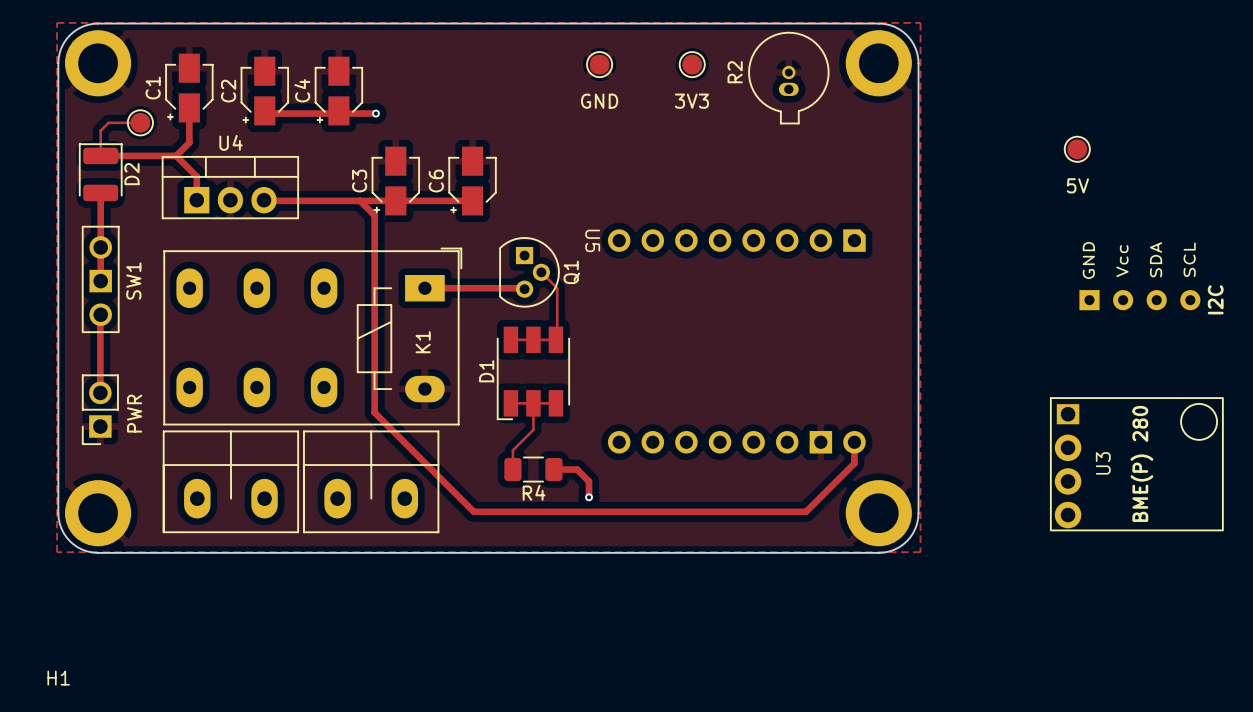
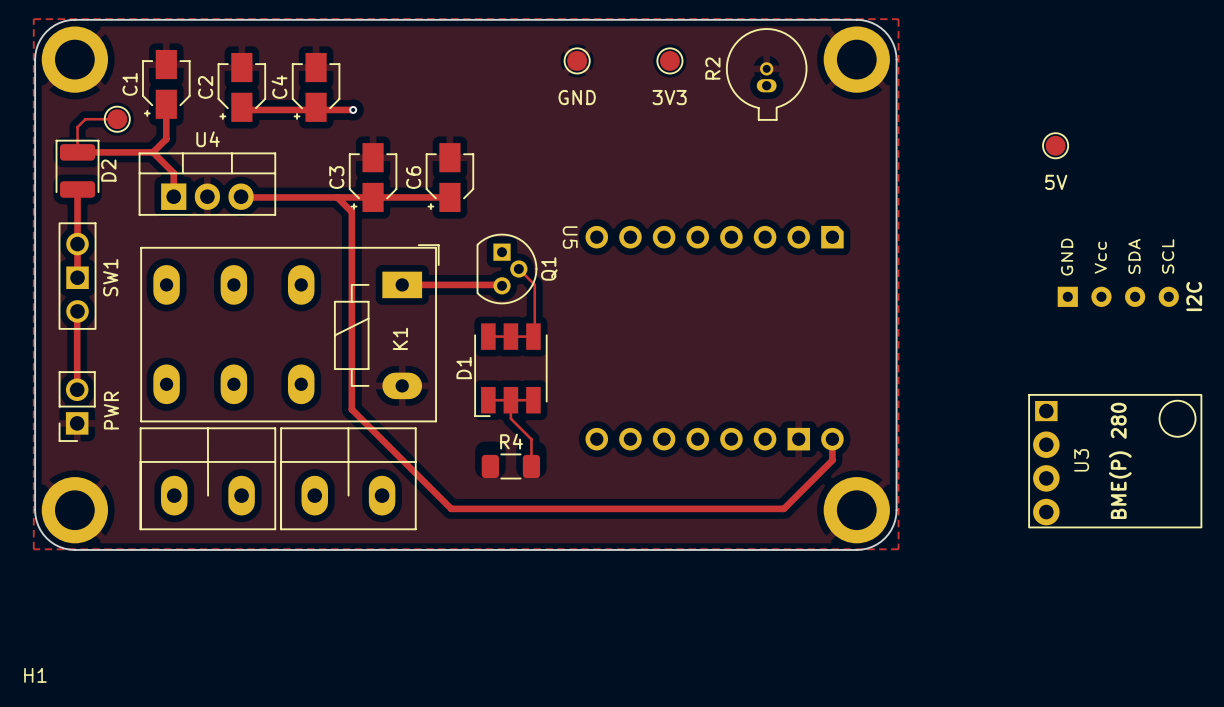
track: (533, 421) (533, 429) (512, 450) (512, 469) -> (510, 418) (531, 439) (531, 459)
track: (553, 469) (577, 469) (589, 481) (589, 497) -> none
R4 name position: R4 (534, 492) -> R4 (511, 441)
via: (589, 497) -> none

